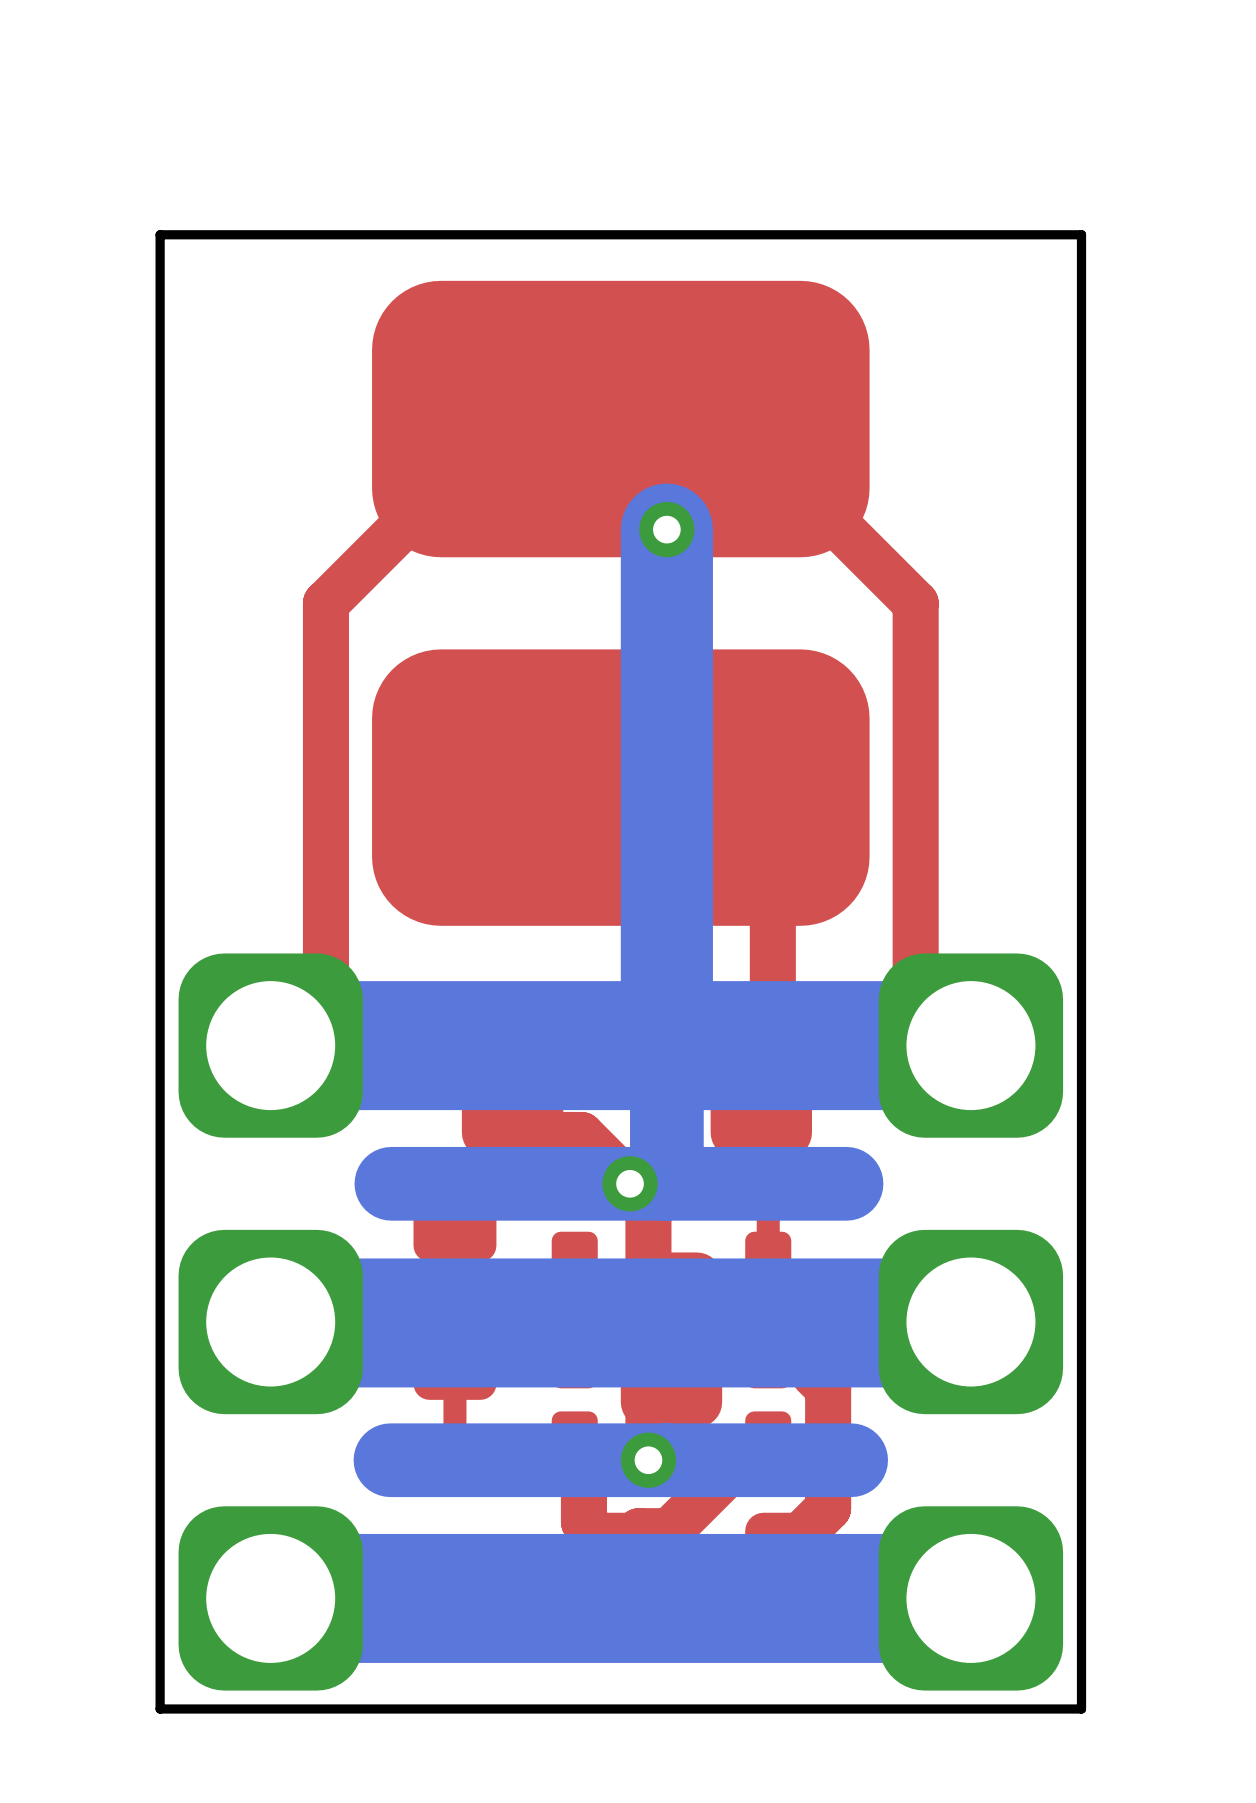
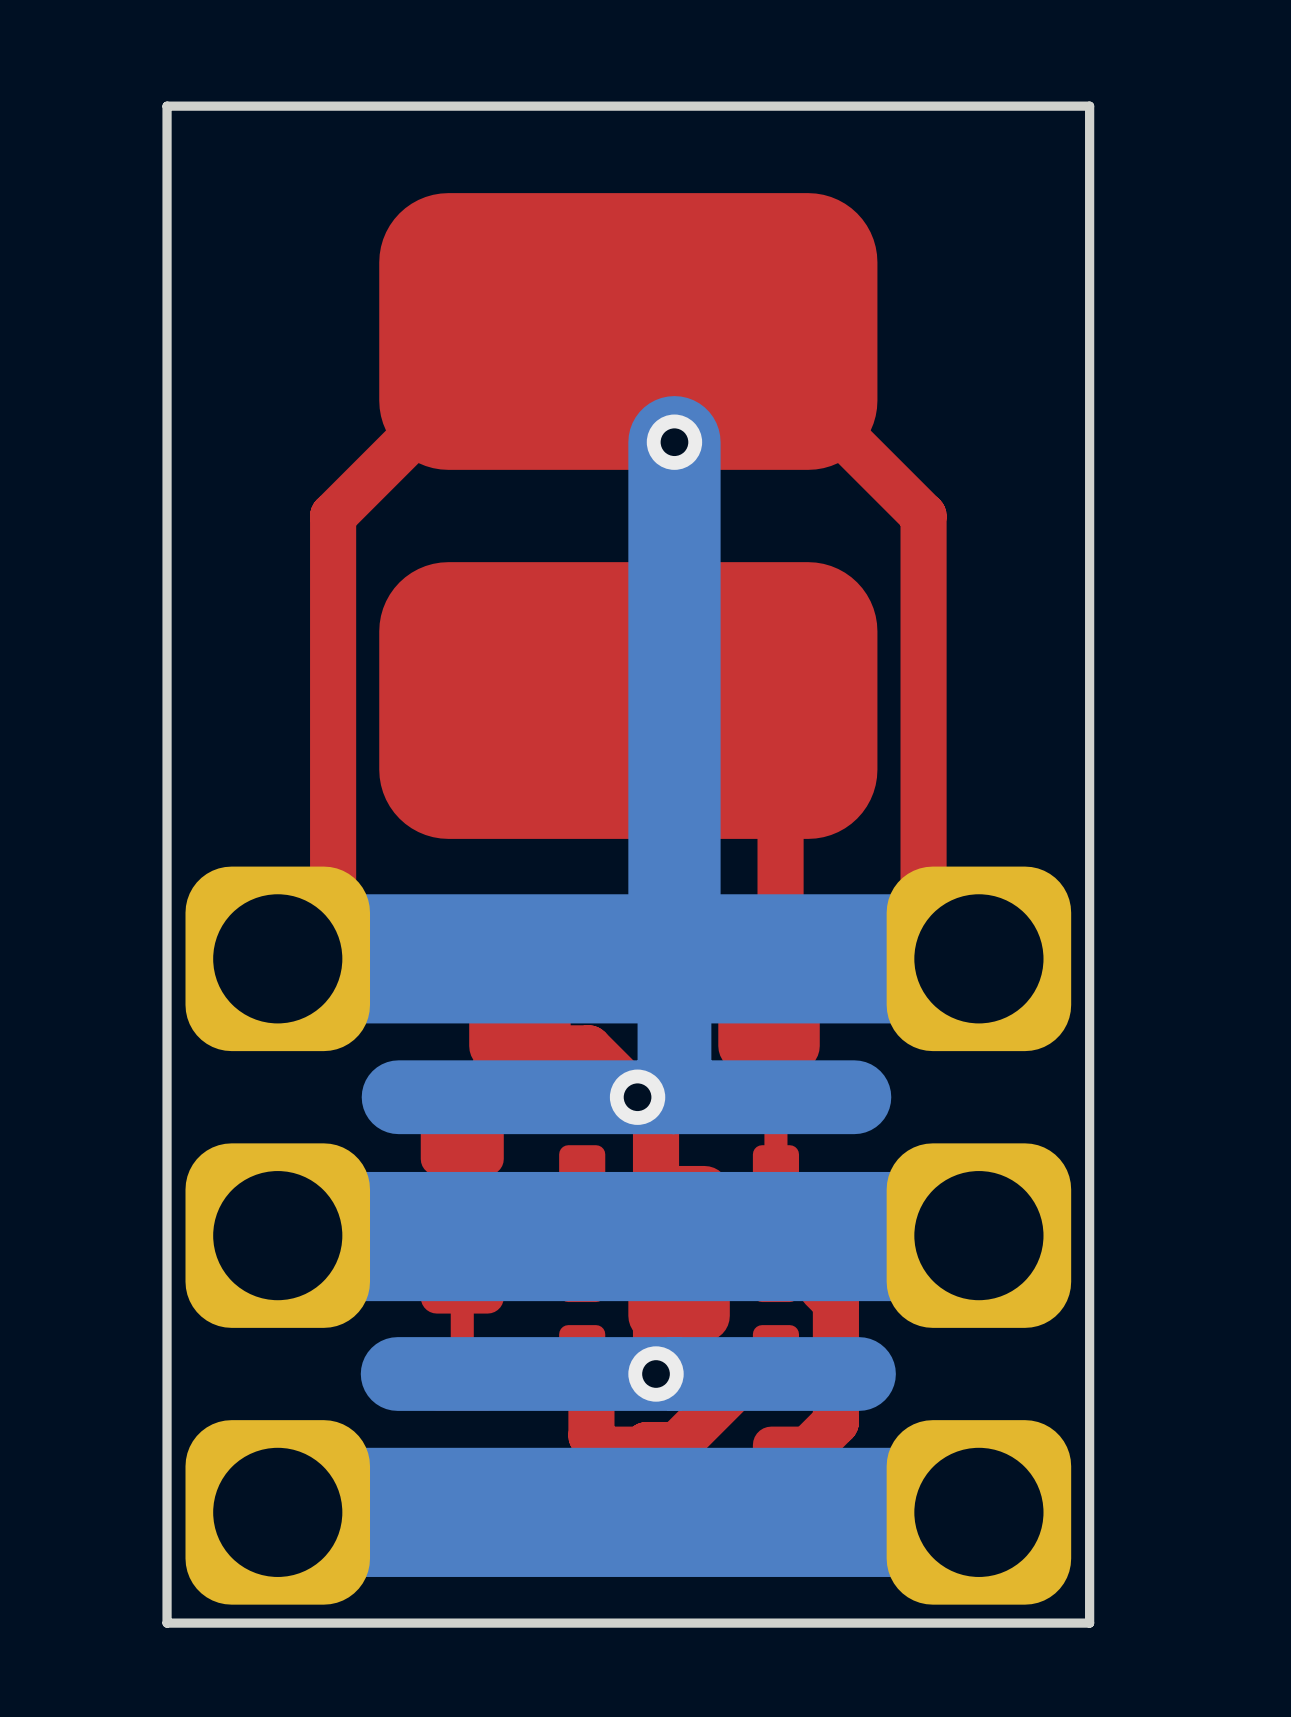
board edge: (1081, 234) (160, 234) -> (1089, 146) (1089, 106) (167, 106) (167, 146)

